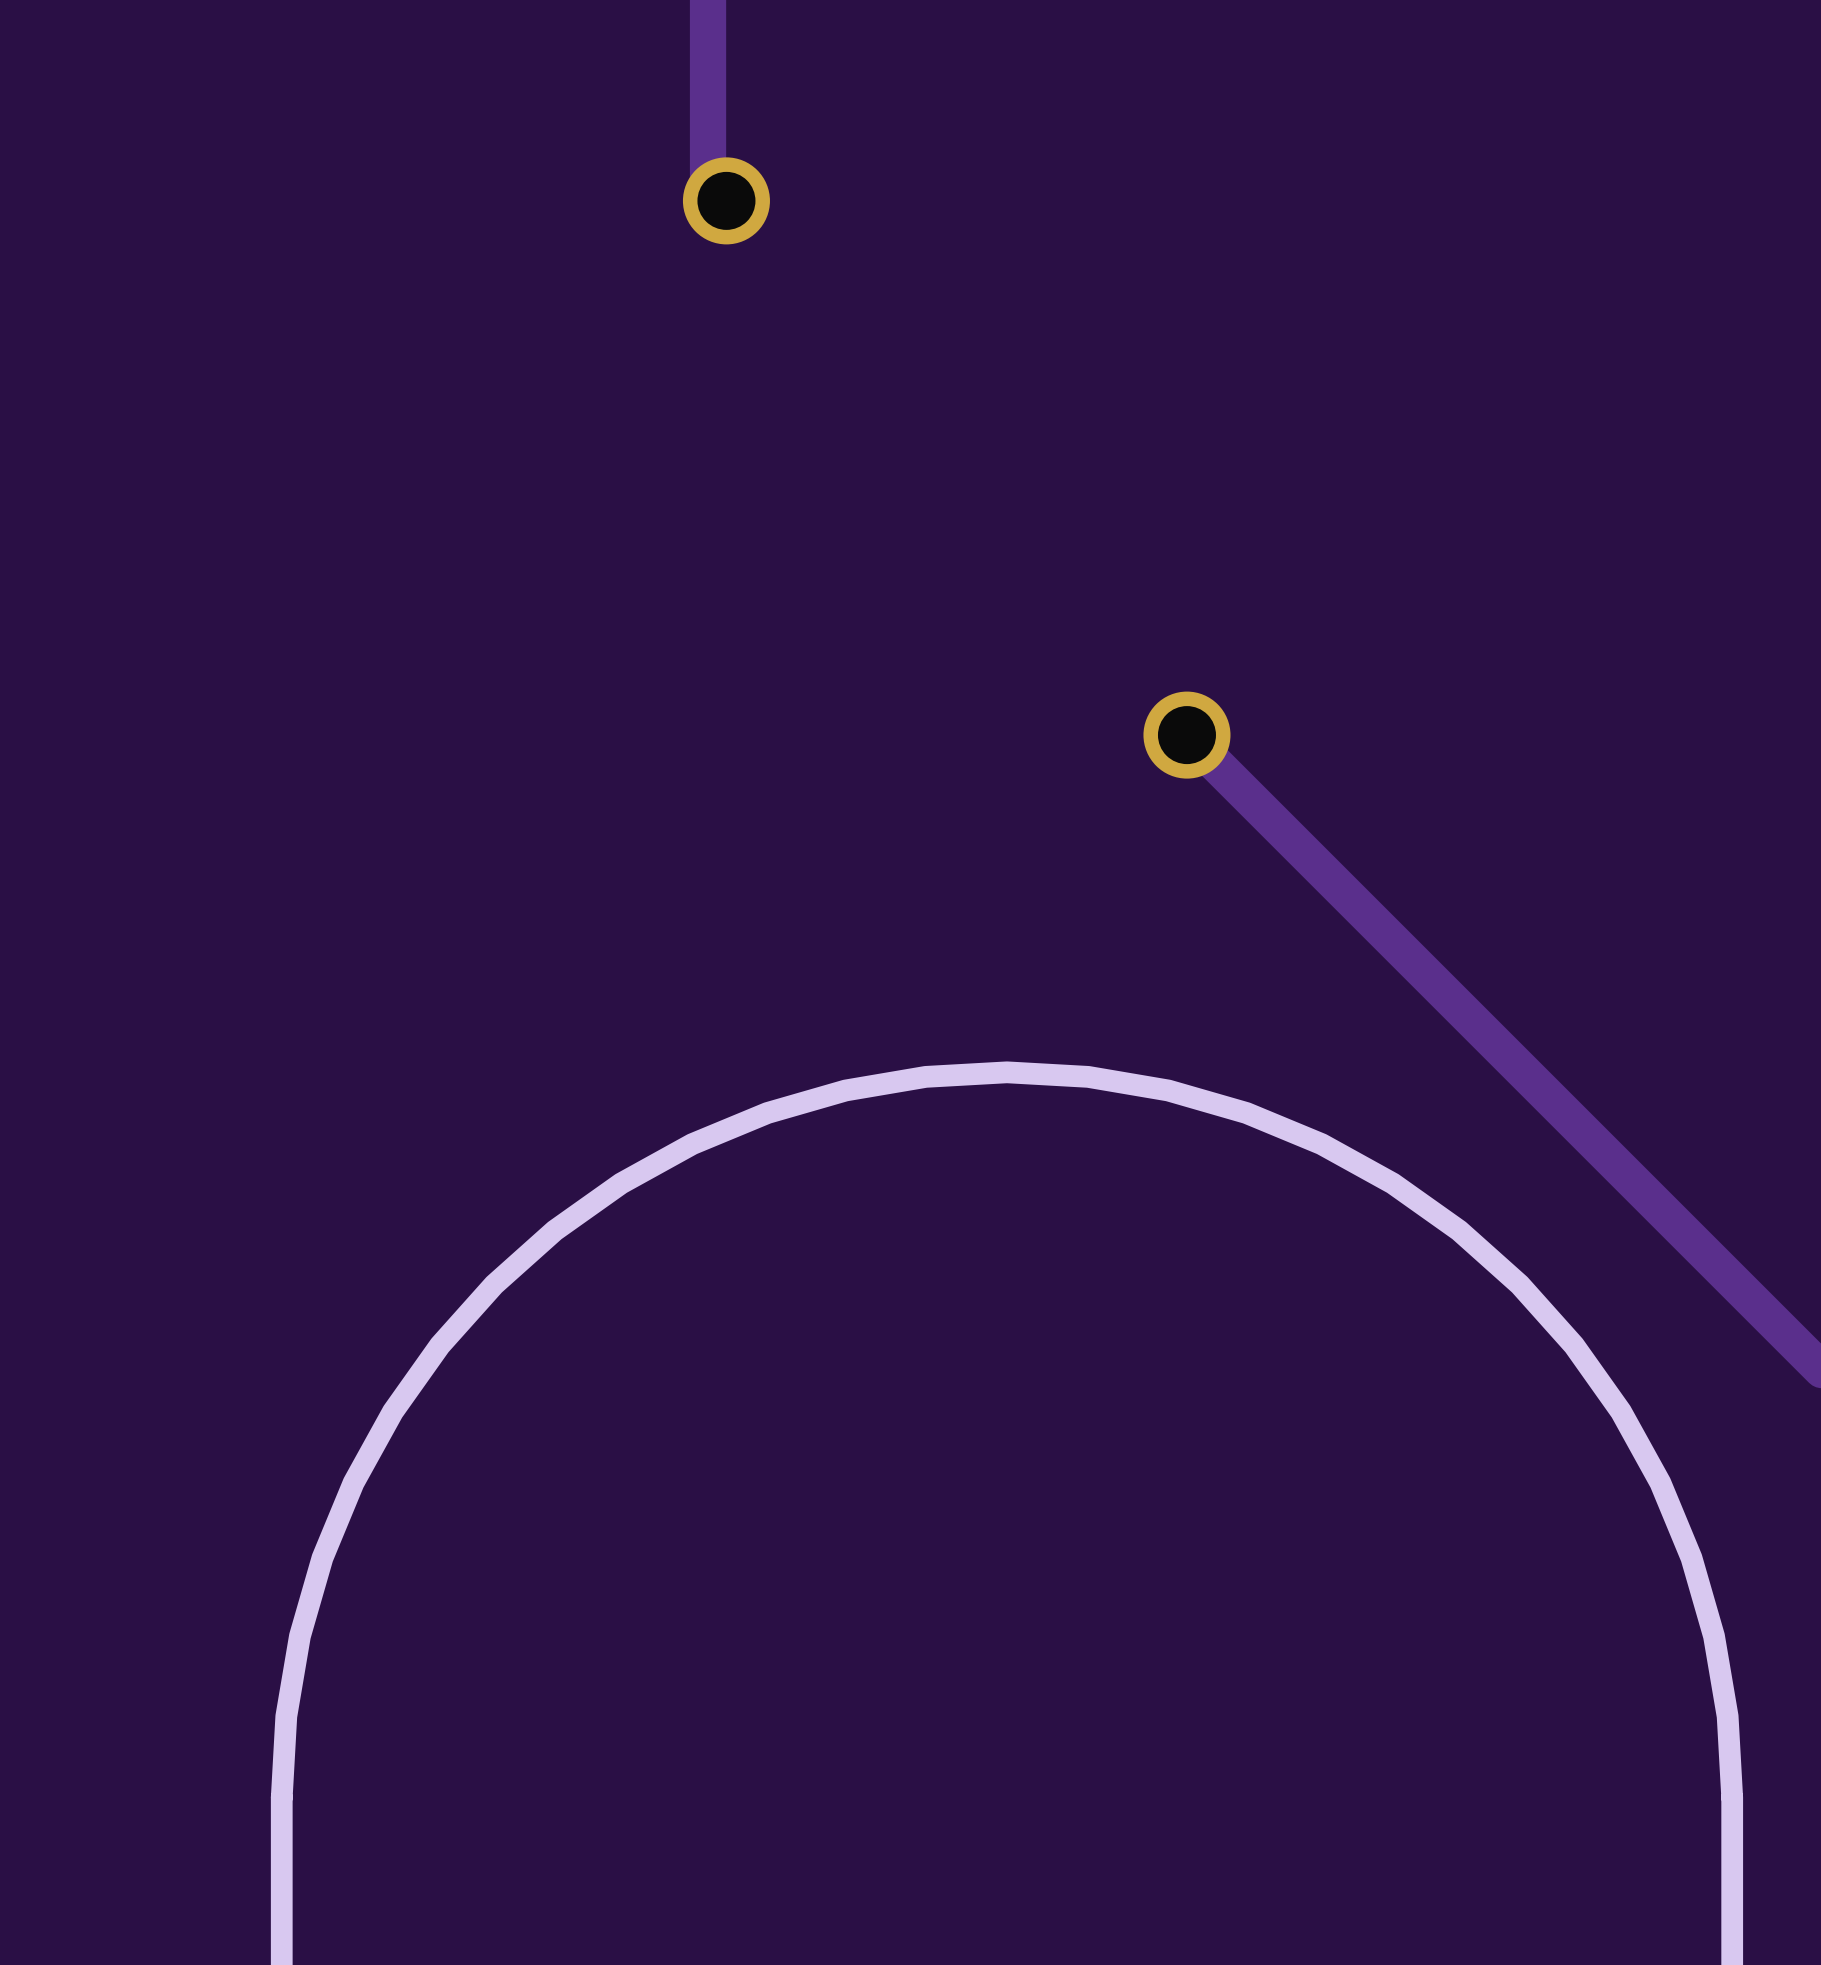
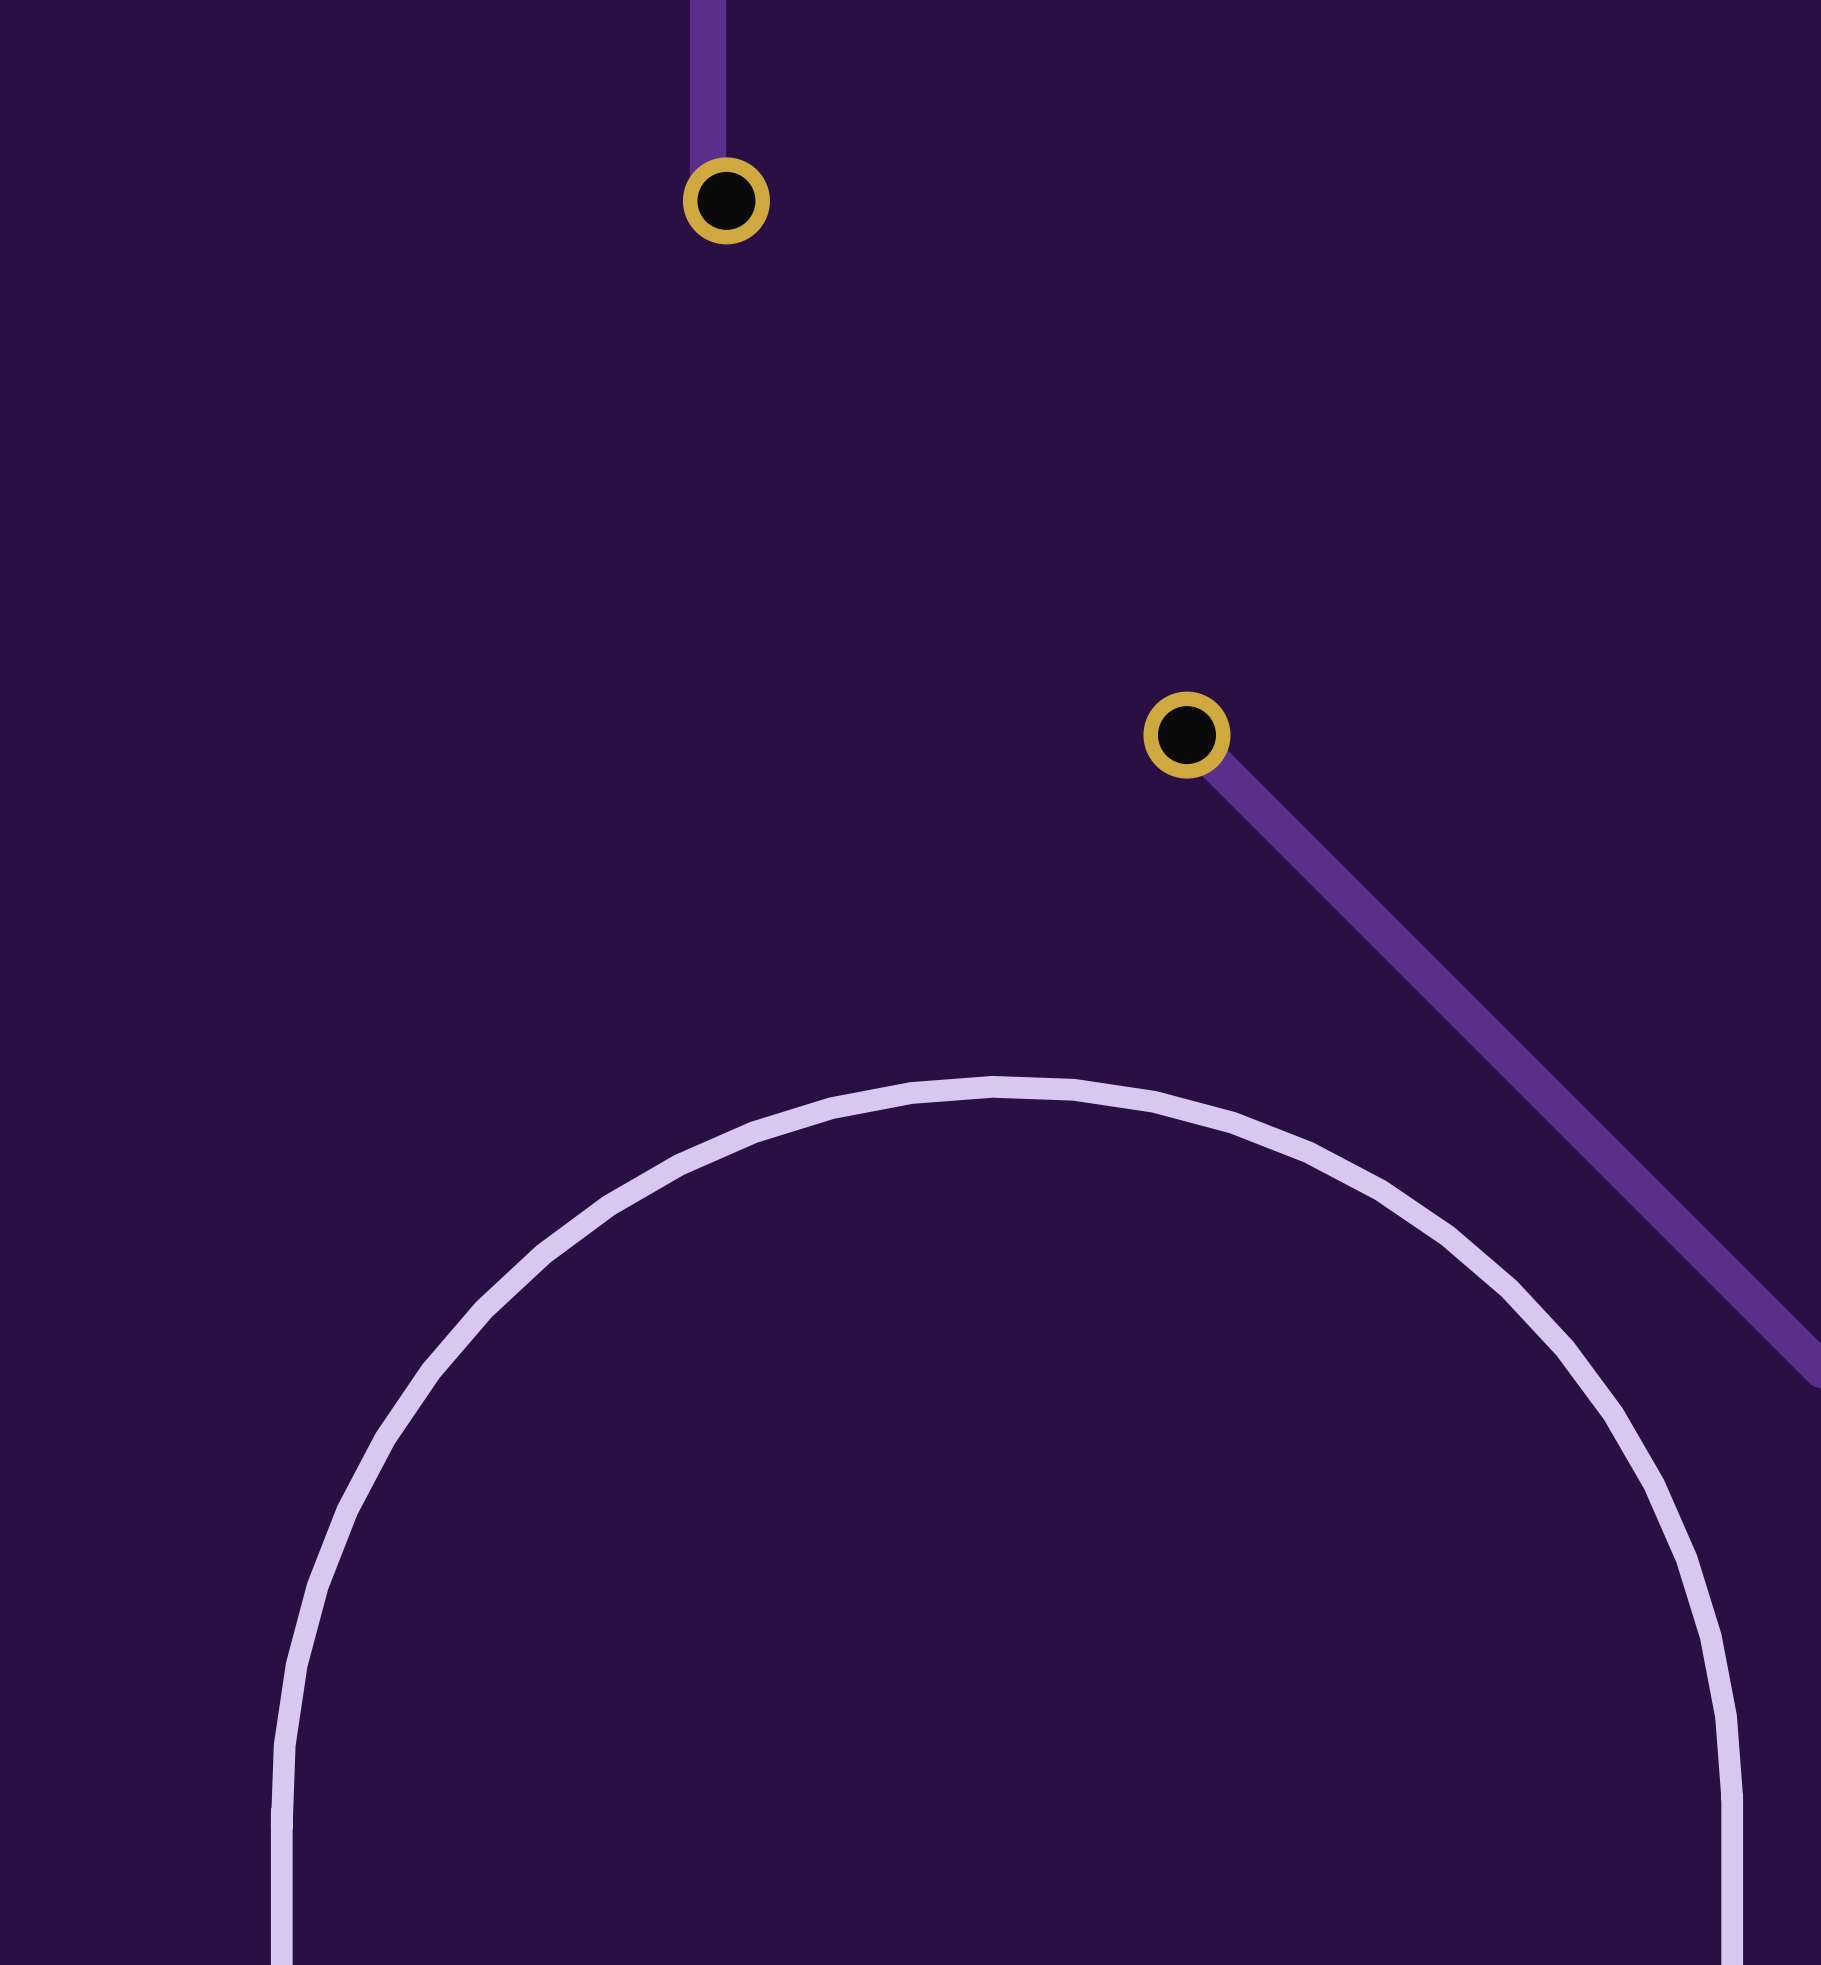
board edge: (1732, 1797) (1727, 1716) (1714, 1636) (1691, 1558) (1660, 1482) (1621, 1411) (1573, 1345) (1519, 1284) (1459, 1230) (1392, 1183) (1321, 1144) (1246, 1113) (1168, 1090) (1088, 1076) (1006, 1072) (925, 1076) (845, 1090) (767, 1113) (692, 1144) (621, 1183) (554, 1230) (494, 1284) (439, 1345) (392, 1411) (353, 1482) (322, 1558) (299, 1636) (286, 1716) (281, 1812) -> (1732, 1797) (1726, 1716) (1710, 1636) (1686, 1558) (1654, 1484) (1613, 1413) (1564, 1348) (1509, 1288) (1447, 1236) (1380, 1190) (1308, 1152) (1232, 1122) (1154, 1101) (1073, 1089) (992, 1086) (911, 1093) (831, 1108) (753, 1132) (679, 1164) (608, 1205) (543, 1254) (483, 1309) (430, 1371) (385, 1438) (347, 1510) (317, 1586) (296, 1664) (284, 1745) (281, 1826)

